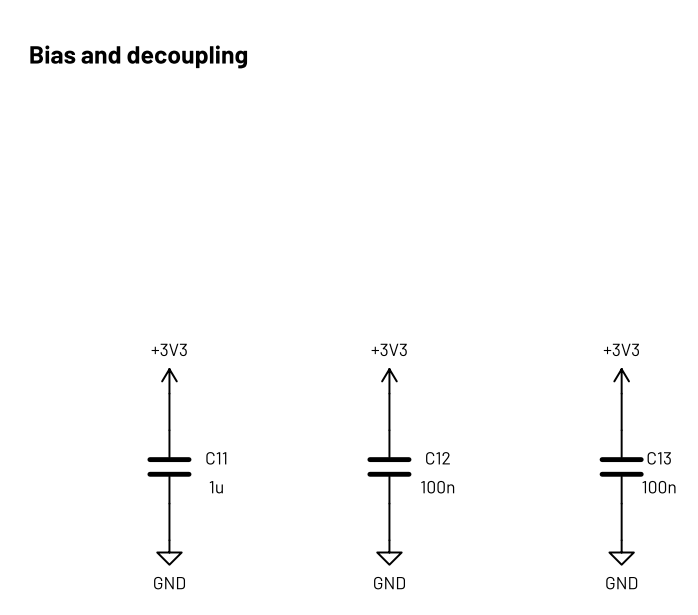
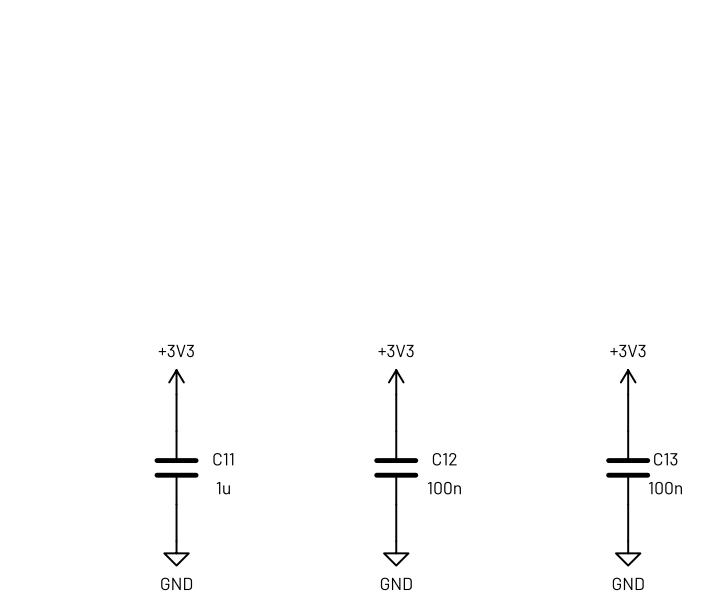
text: Bias and decoupling (138, 56) -> none

